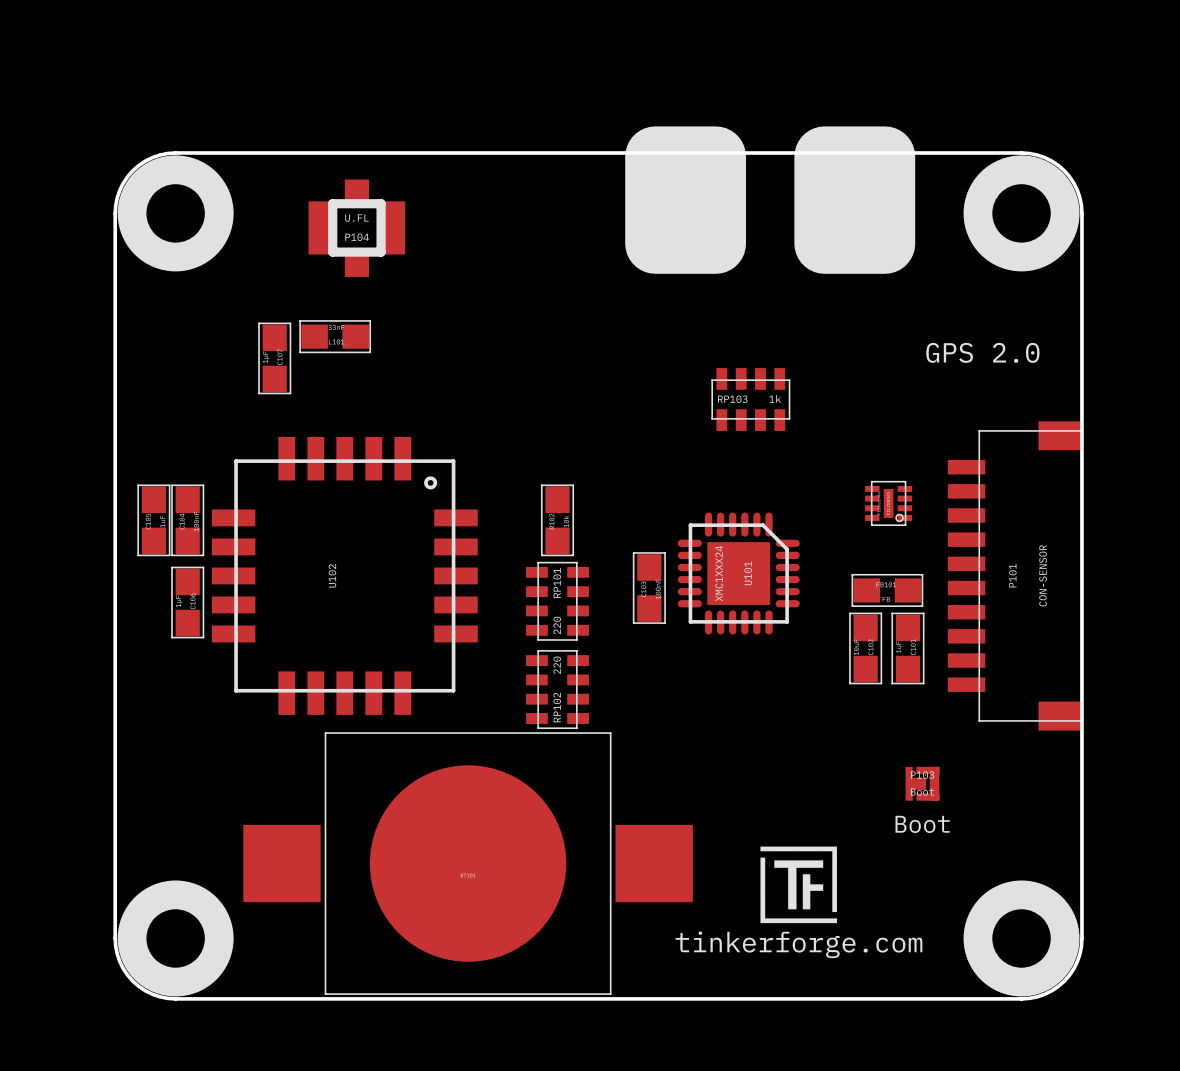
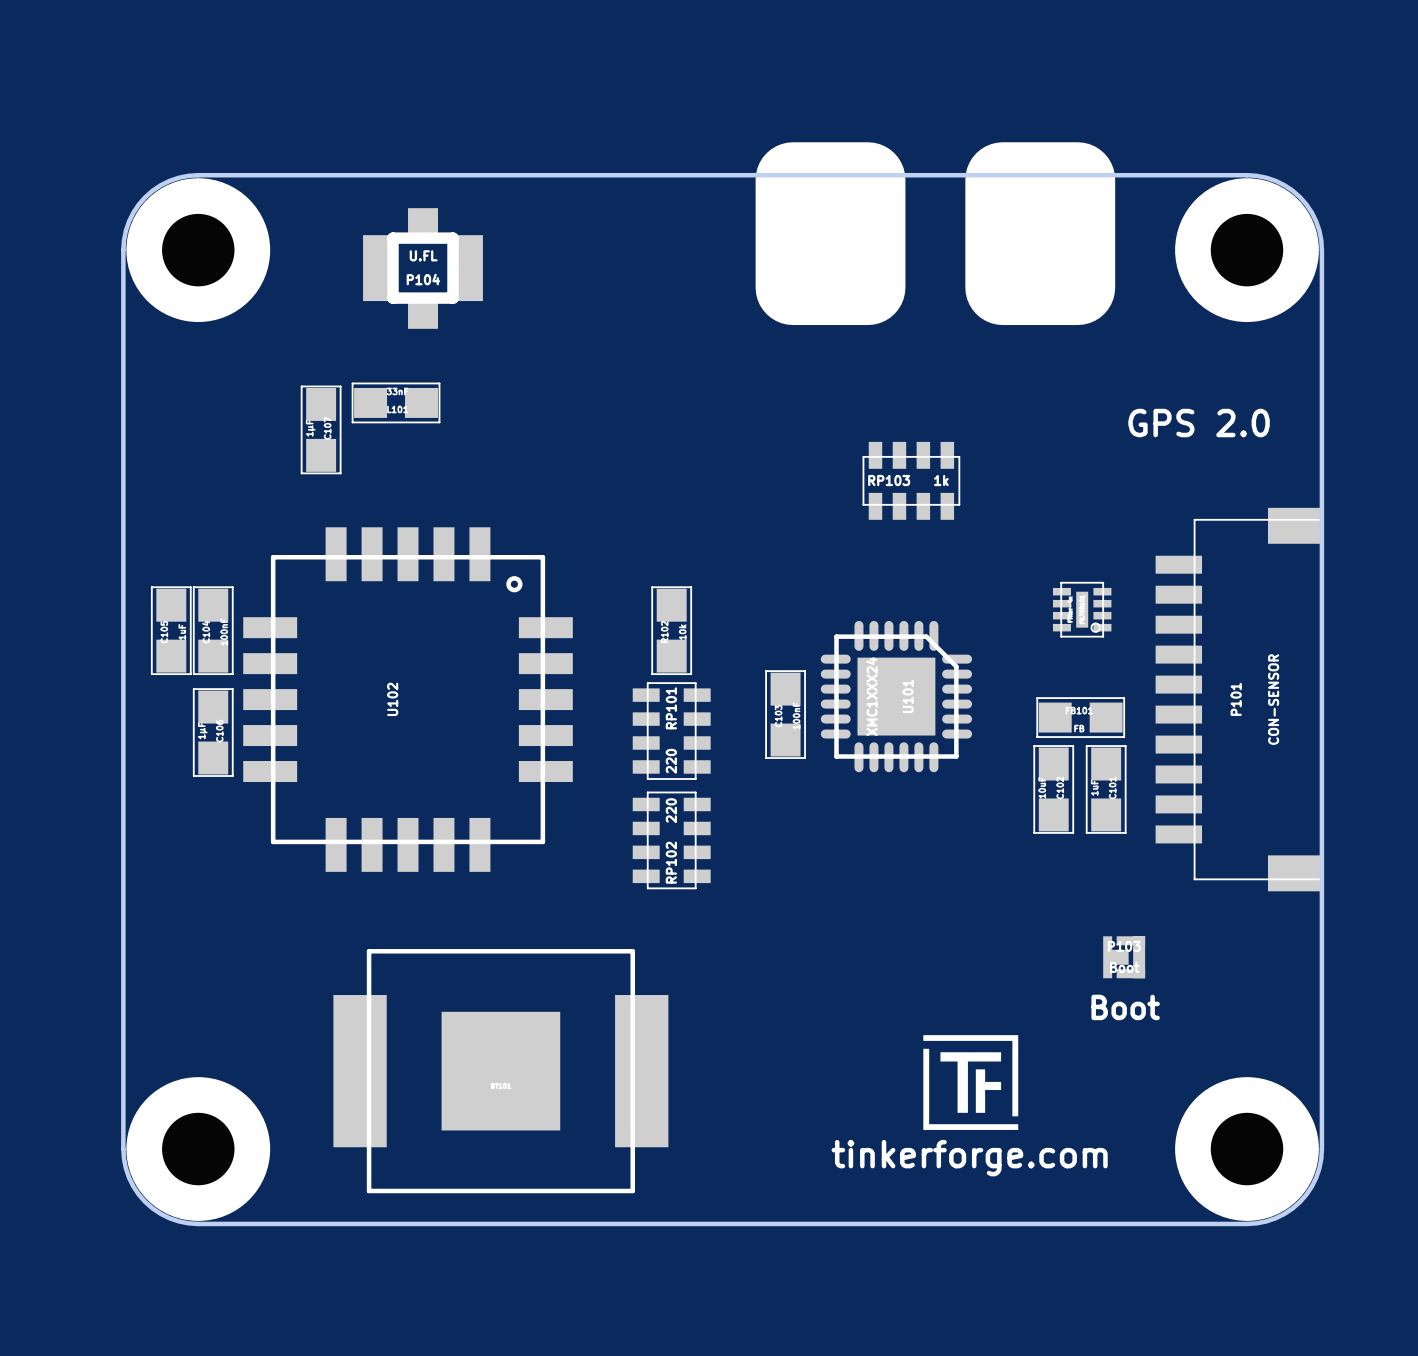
part footprint: [243, 732, 693, 995] -> [333, 949, 669, 1194]

